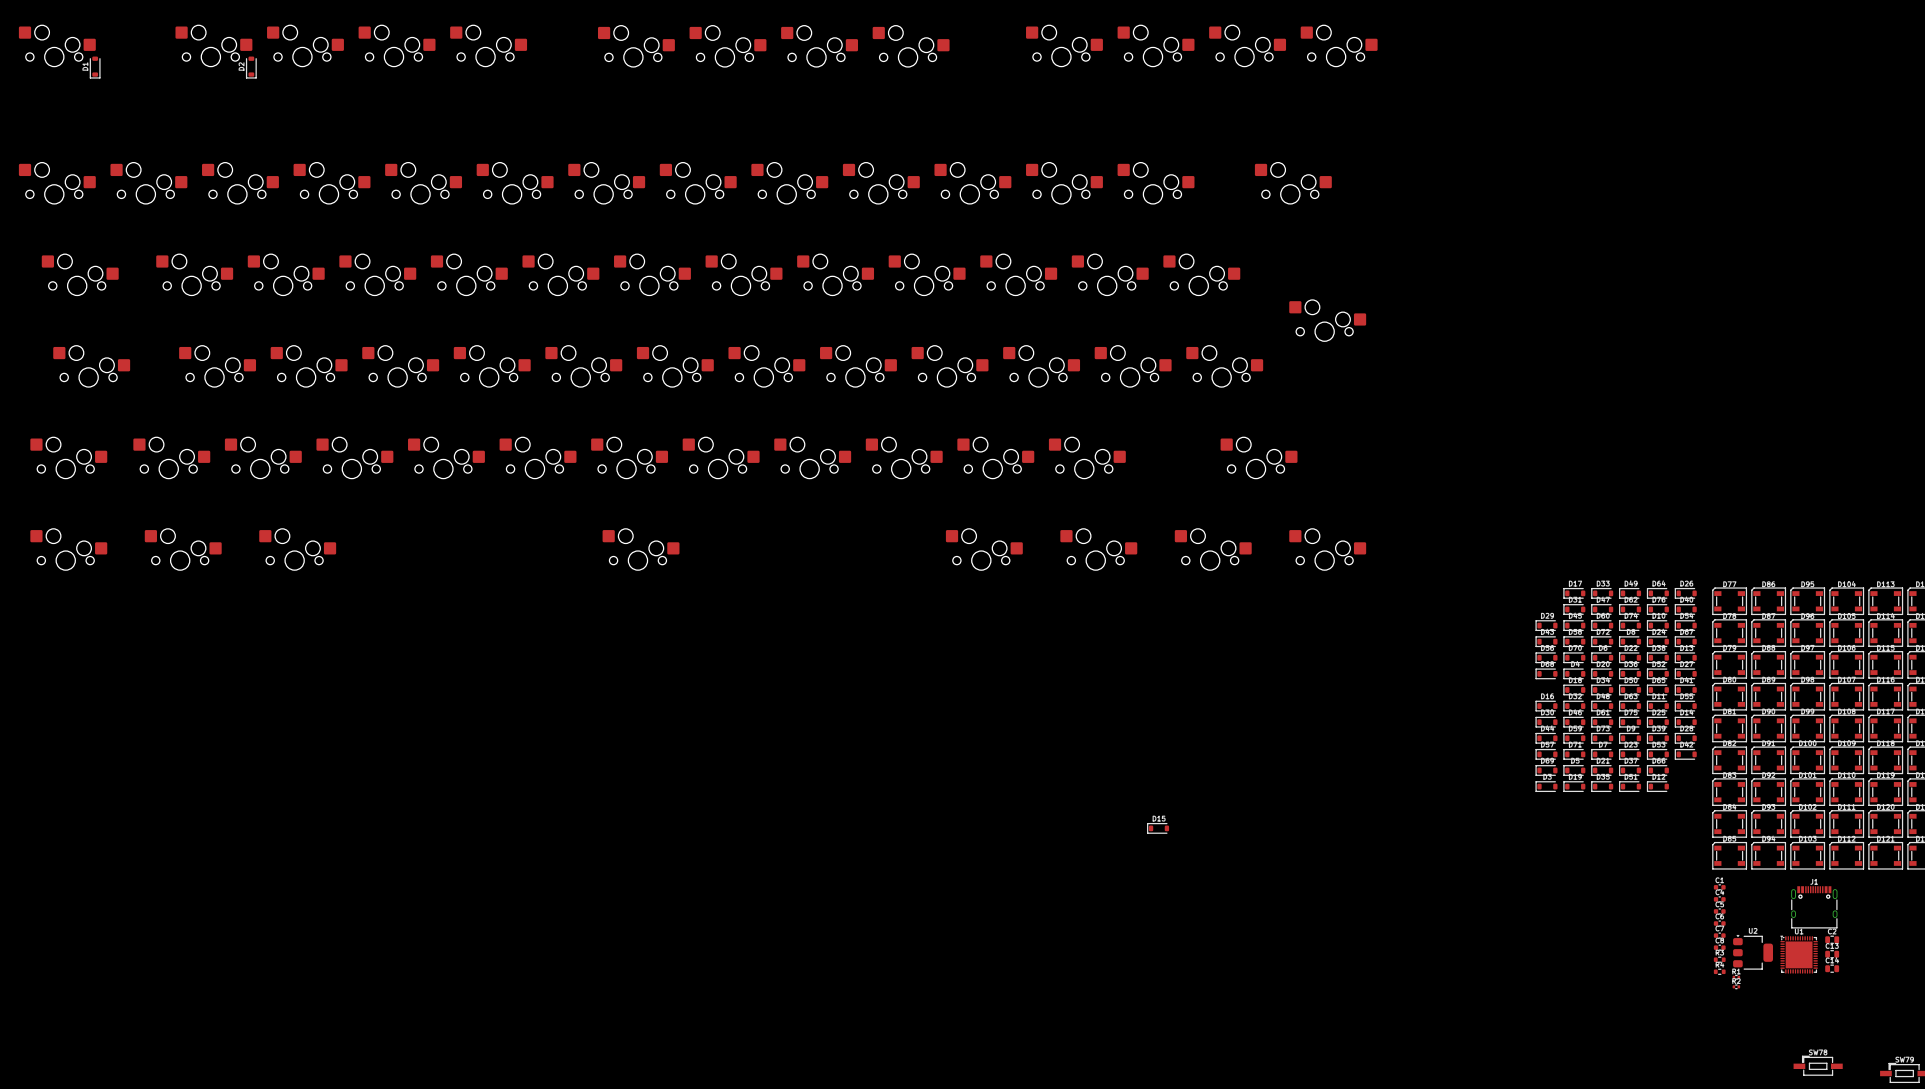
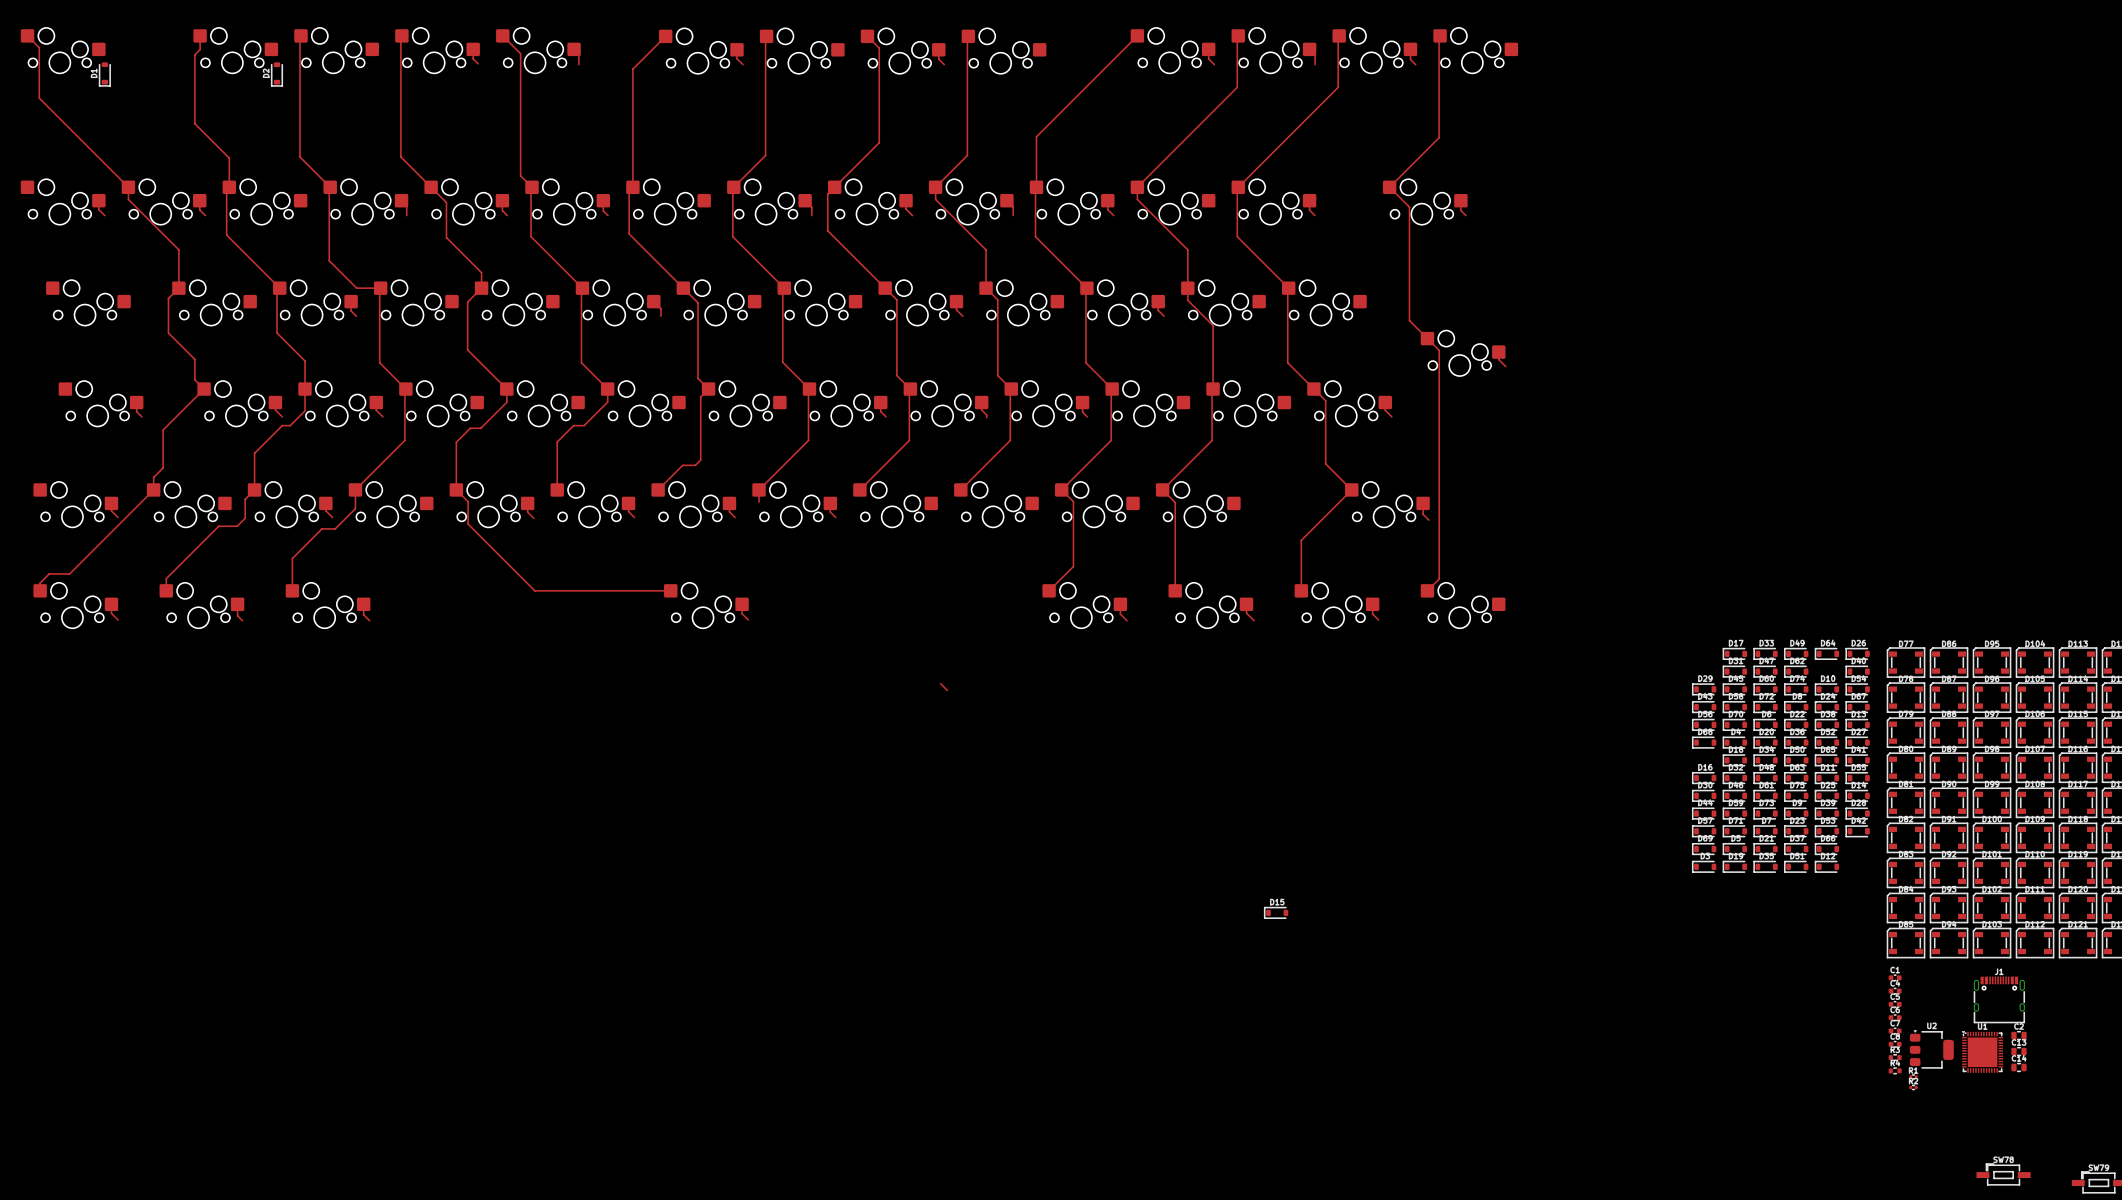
top track: none -> (27, 35) (39, 47) (39, 98) (128, 187) (128, 199) (178, 249) (178, 288) (168, 298)
top track: none -> (200, 35) (200, 49) (194, 54) (194, 123) (229, 158) (229, 187) (226, 189) (226, 235) (279, 288) (276, 290) (276, 332) (305, 360) (305, 410) (290, 425) (282, 425) (254, 453) (254, 489) (245, 499) (245, 518) (237, 526) (218, 526) (166, 578) (166, 590)
top track: none -> (301, 35) (300, 157) (330, 187) (329, 260) (356, 288) (380, 288) (379, 362) (405, 389) (404, 440) (355, 489) (355, 508) (335, 528) (322, 528) (292, 558) (292, 590)
top track: none -> (401, 35) (400, 157) (446, 202) (446, 237) (481, 272) (481, 288) (467, 302) (467, 349) (506, 389) (506, 402) (480, 428) (470, 428) (456, 442) (456, 489) (468, 501) (468, 524) (534, 590) (670, 590)
top track: none -> (502, 35) (520, 53) (520, 175) (532, 187) (531, 236) (582, 288) (581, 362) (607, 389) (607, 402) (584, 425) (573, 425) (557, 441) (557, 489)
top track: none -> (665, 36) (632, 69) (632, 187) (629, 191) (629, 233) (698, 302) (698, 378) (708, 389) (700, 396) (700, 460) (695, 465) (682, 465) (658, 489)
top track: none -> (766, 36) (765, 155) (732, 188) (732, 236) (784, 288) (782, 362) (809, 389) (808, 440) (759, 489) (759, 502)
top track: none -> (867, 36) (879, 48) (879, 142) (827, 194) (827, 230) (896, 299) (896, 375) (910, 389) (909, 440) (859, 489)
top track: none -> (968, 36) (967, 155) (935, 187) (935, 199) (986, 249) (986, 288) (997, 299) (997, 375) (1011, 389) (1010, 440) (960, 489)
top track: none -> (1137, 35) (1036, 136) (1035, 236) (1086, 288) (1085, 362) (1112, 389) (1111, 440) (1061, 489) (1073, 501) (1073, 566) (1049, 590)
top track: none -> (1238, 35) (1237, 87) (1137, 187) (1137, 199) (1187, 249) (1187, 300) (1213, 325) (1212, 440) (1162, 489) (1175, 502) (1175, 590)
top track: none -> (1339, 35) (1338, 87) (1237, 188) (1237, 236) (1288, 288) (1287, 362) (1325, 400) (1325, 463) (1351, 489) (1301, 540) (1301, 590)
top track: none -> (1440, 35) (1439, 137) (1389, 187) (1409, 207) (1409, 320) (1439, 350) (1439, 579) (1427, 590)
top track: none -> (473, 49) (473, 58) (478, 63)
top track: none -> (574, 49) (578, 54) (578, 64)
top track: none -> (1208, 49) (1208, 58) (1214, 64)
top track: none -> (1309, 49) (1315, 54) (1315, 64)
top track: none -> (1410, 49) (1410, 59) (1415, 64)
top track: none -> (737, 49) (737, 58) (743, 64)
top track: none -> (938, 49) (938, 59) (944, 64)
top track: none -> (98, 200) (98, 209) (104, 215)
top track: none -> (199, 200) (199, 209) (205, 215)
top track: none -> (401, 200) (406, 205) (406, 215)
top track: none -> (502, 200) (502, 210) (507, 215)
top track: none -> (603, 200) (603, 210) (608, 215)
top track: none -> (805, 200) (811, 207) (811, 215)
top track: none -> (906, 200) (906, 209) (912, 215)
top track: none -> (1006, 200) (1013, 206) (1013, 215)
top track: none -> (1107, 200) (1107, 209) (1113, 215)
top track: none -> (1309, 200) (1309, 210) (1315, 215)
top track: none -> (1460, 200) (1460, 210) (1466, 215)
top track: none -> (168, 298) (168, 333) (194, 359) (194, 379) (204, 389) (163, 430) (163, 468) (153, 477) (153, 489) (69, 573) (49, 573) (40, 583) (40, 590)
top track: none -> (351, 301) (351, 310) (356, 316)
top track: none -> (653, 301) (660, 308) (660, 316)
top track: none -> (956, 301) (956, 309) (962, 316)
top track: none -> (1158, 301) (1158, 310) (1164, 316)
top track: none -> (1498, 352) (1498, 359) (1505, 366)
top track: none -> (136, 402) (136, 411) (141, 416)
top track: none -> (275, 402) (275, 410) (282, 416)
top track: none -> (376, 402) (376, 410) (382, 416)
top track: none -> (880, 402) (880, 411) (886, 416)
top track: none -> (981, 402) (981, 410) (986, 417)
top track: none -> (1082, 402) (1082, 412) (1087, 416)
top track: none -> (1385, 402) (1385, 410) (1391, 416)
top track: none -> (111, 503) (111, 510) (118, 517)
top track: none -> (325, 503) (325, 510) (332, 517)
top track: none -> (527, 503) (527, 512) (533, 518)
top track: none -> (628, 503) (628, 511) (634, 517)
top track: none -> (729, 503) (729, 511) (735, 517)
top track: none -> (830, 503) (830, 512) (835, 517)
top track: none -> (1423, 503) (1423, 514) (1428, 520)
top track: none -> (111, 604) (111, 613) (118, 620)
top track: none -> (237, 604) (237, 615) (242, 620)
top track: none -> (363, 604) (363, 614) (369, 620)
top track: none -> (742, 604) (742, 613) (748, 620)
top track: none -> (1120, 604) (1120, 614) (1127, 620)
top track: none -> (1246, 604) (1246, 613) (1254, 620)
top track: none -> (1372, 604) (1372, 614) (1378, 620)
part: (1658, 609) -> none
top track: none -> (940, 683) (947, 690)

